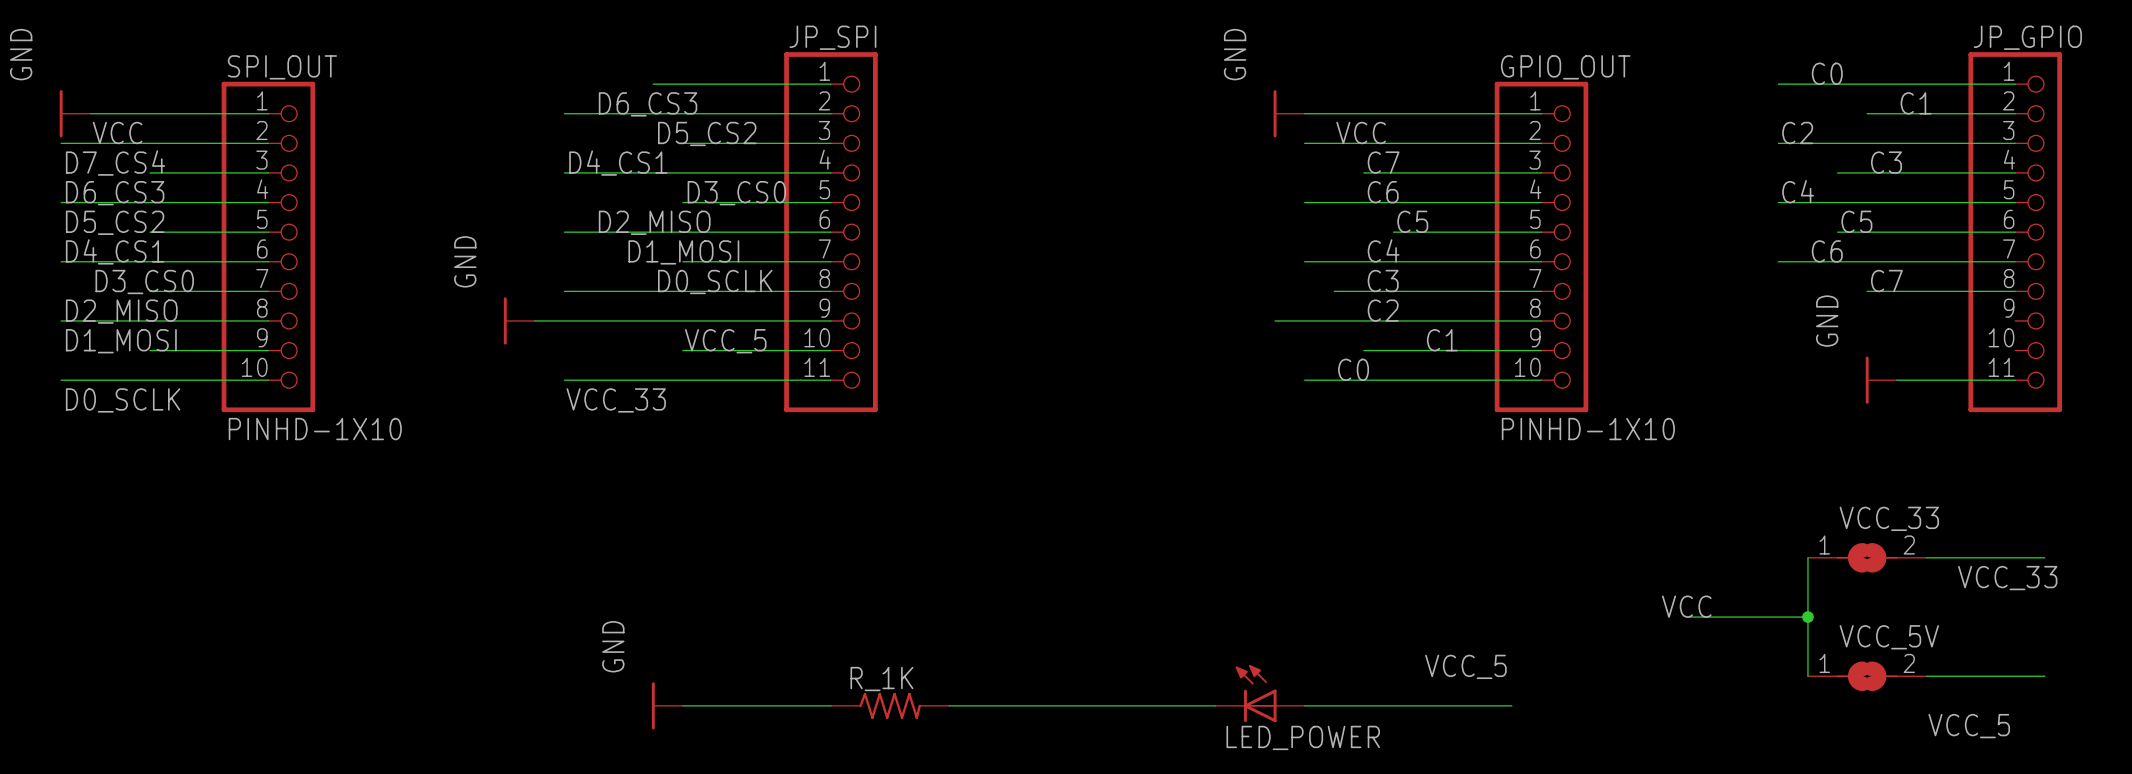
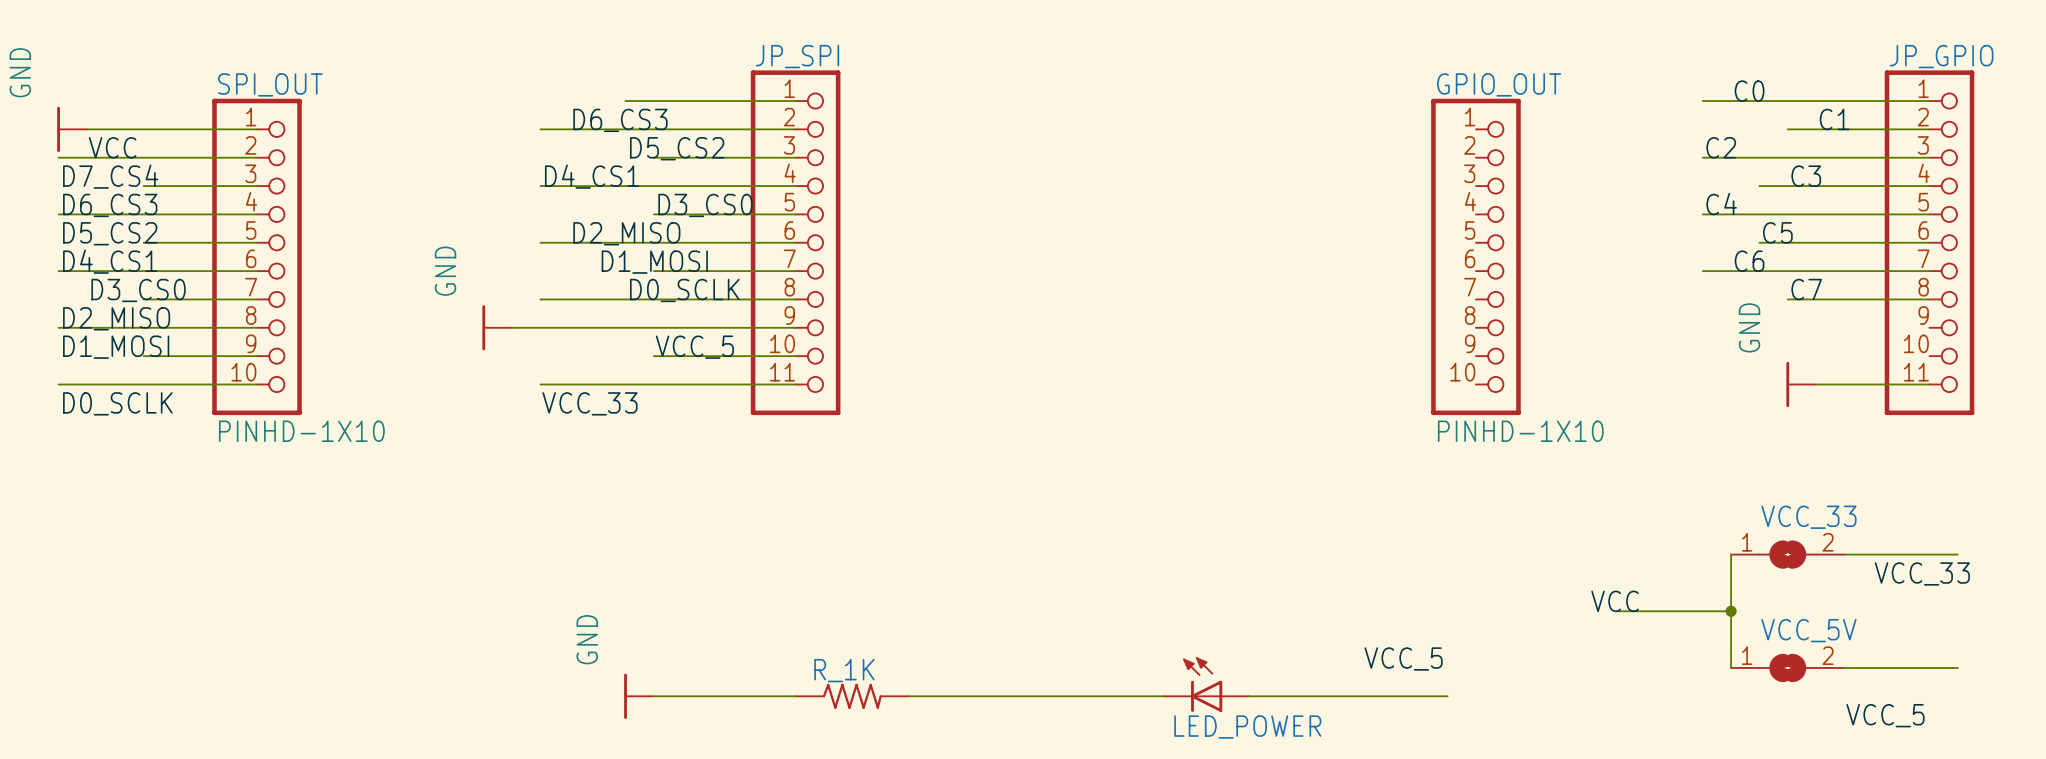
power symbol: GND (1289, 113) -> none
wire: (1304, 113) (1541, 113) -> none
label: VCC (1361, 132) -> none
wire: (1304, 143) (1541, 143) -> none
label: C7 (1383, 162) -> none
wire: (1363, 172) (1541, 172) -> none
label: C6 (1383, 192) -> none
wire: (1304, 202) (1541, 202) -> none
label: C5 (1412, 221) -> none
wire: (1393, 232) (1541, 232) -> none
label: C4 (1383, 250) -> none
wire: (1304, 261) (1541, 261) -> none
label: C3 (1383, 281) -> none
wire: (1334, 291) (1541, 291) -> none
label: C2 (1383, 310) -> none
wire: (1275, 320) (1541, 320) -> none
label: C1 (1442, 340) -> none
wire: (1363, 350) (1541, 350) -> none
label: C0 (1353, 369) -> none
wire: (1304, 380) (1541, 380) -> none

